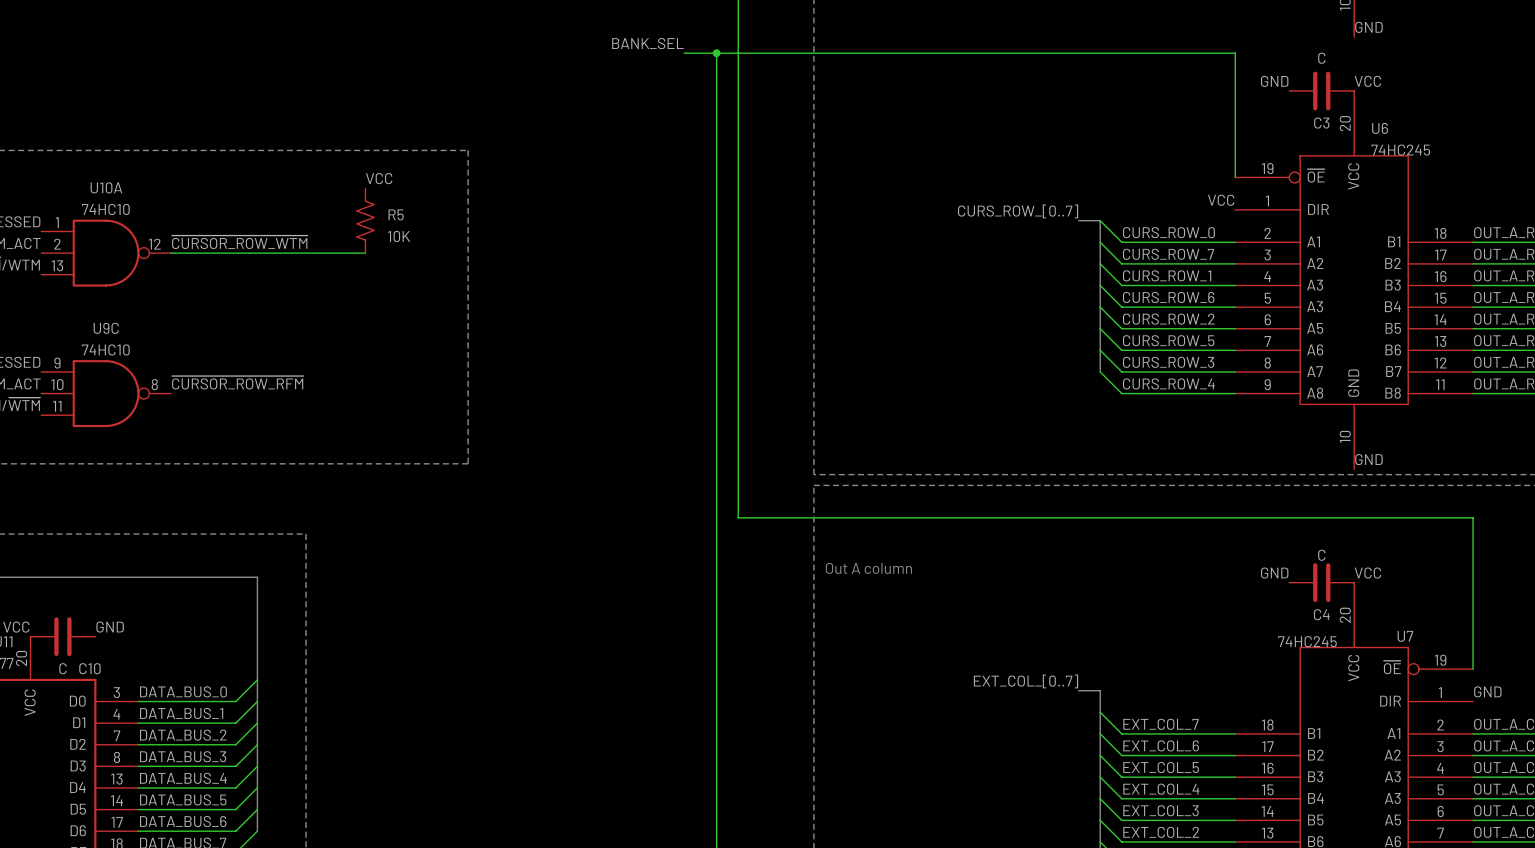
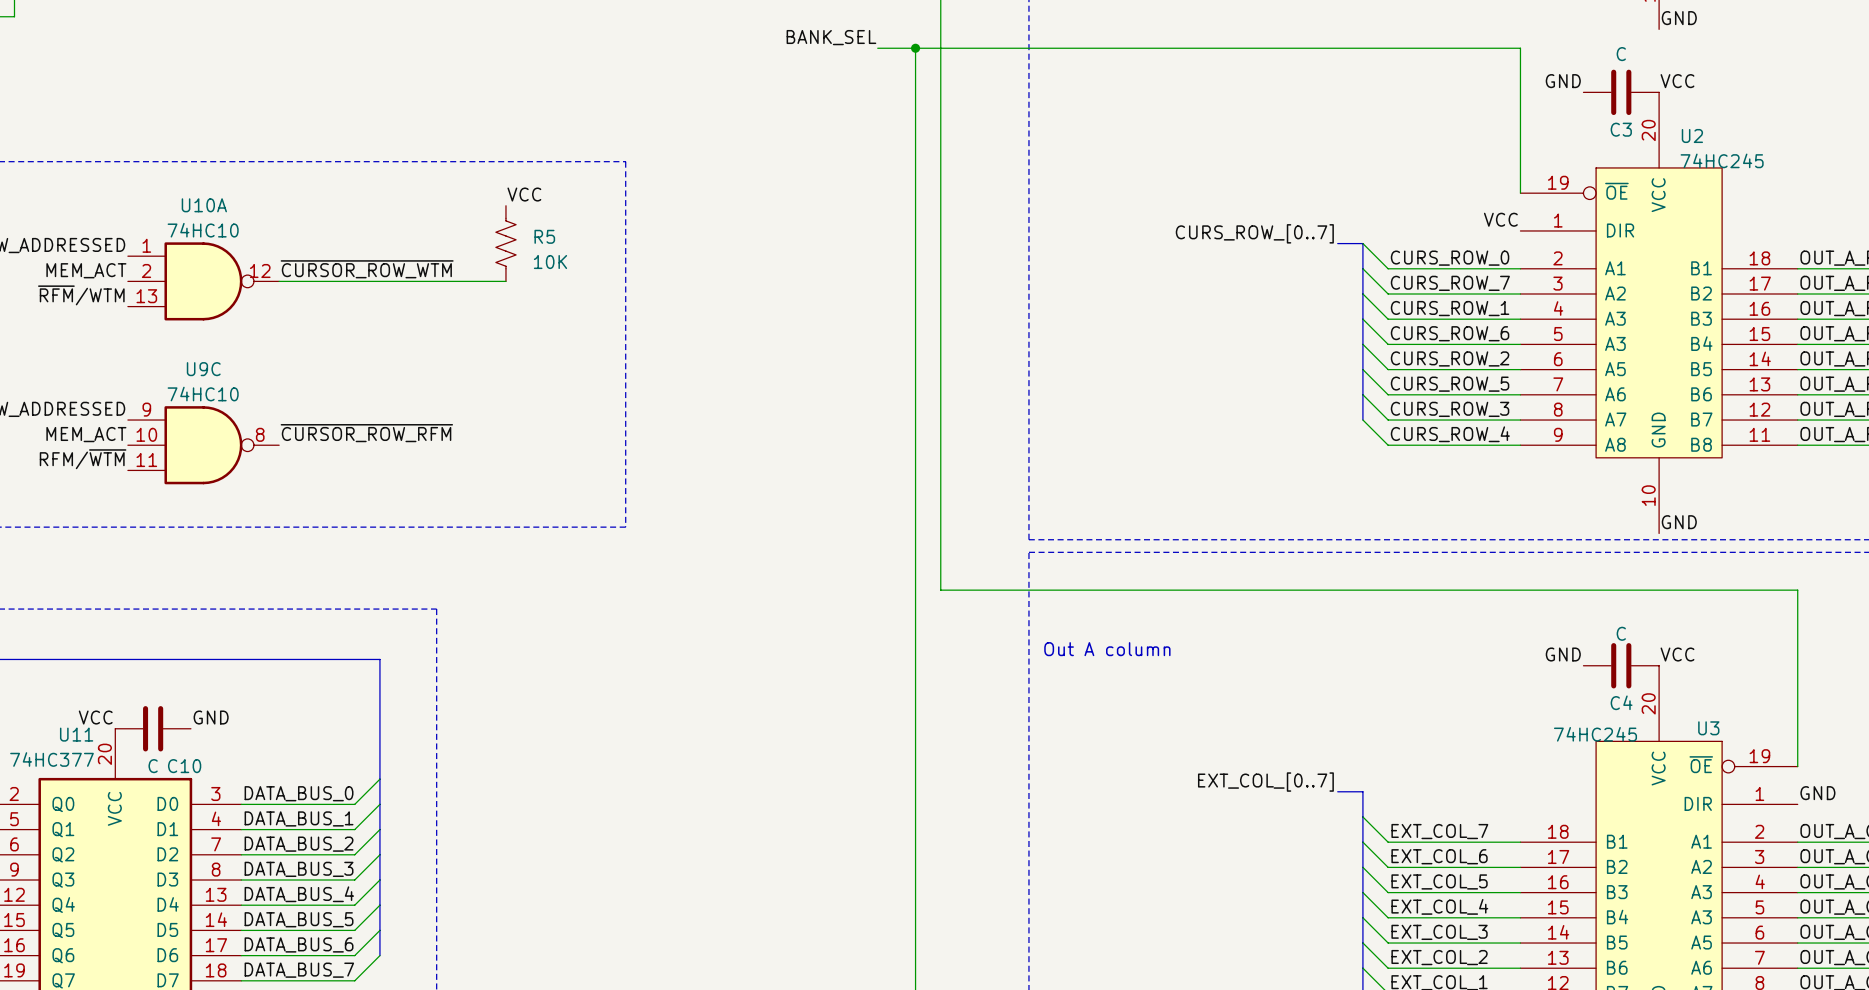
U6 name: U6 (1380, 128) -> U2 (1692, 135)
U7 name: U7 (1405, 636) -> U3 (1708, 728)

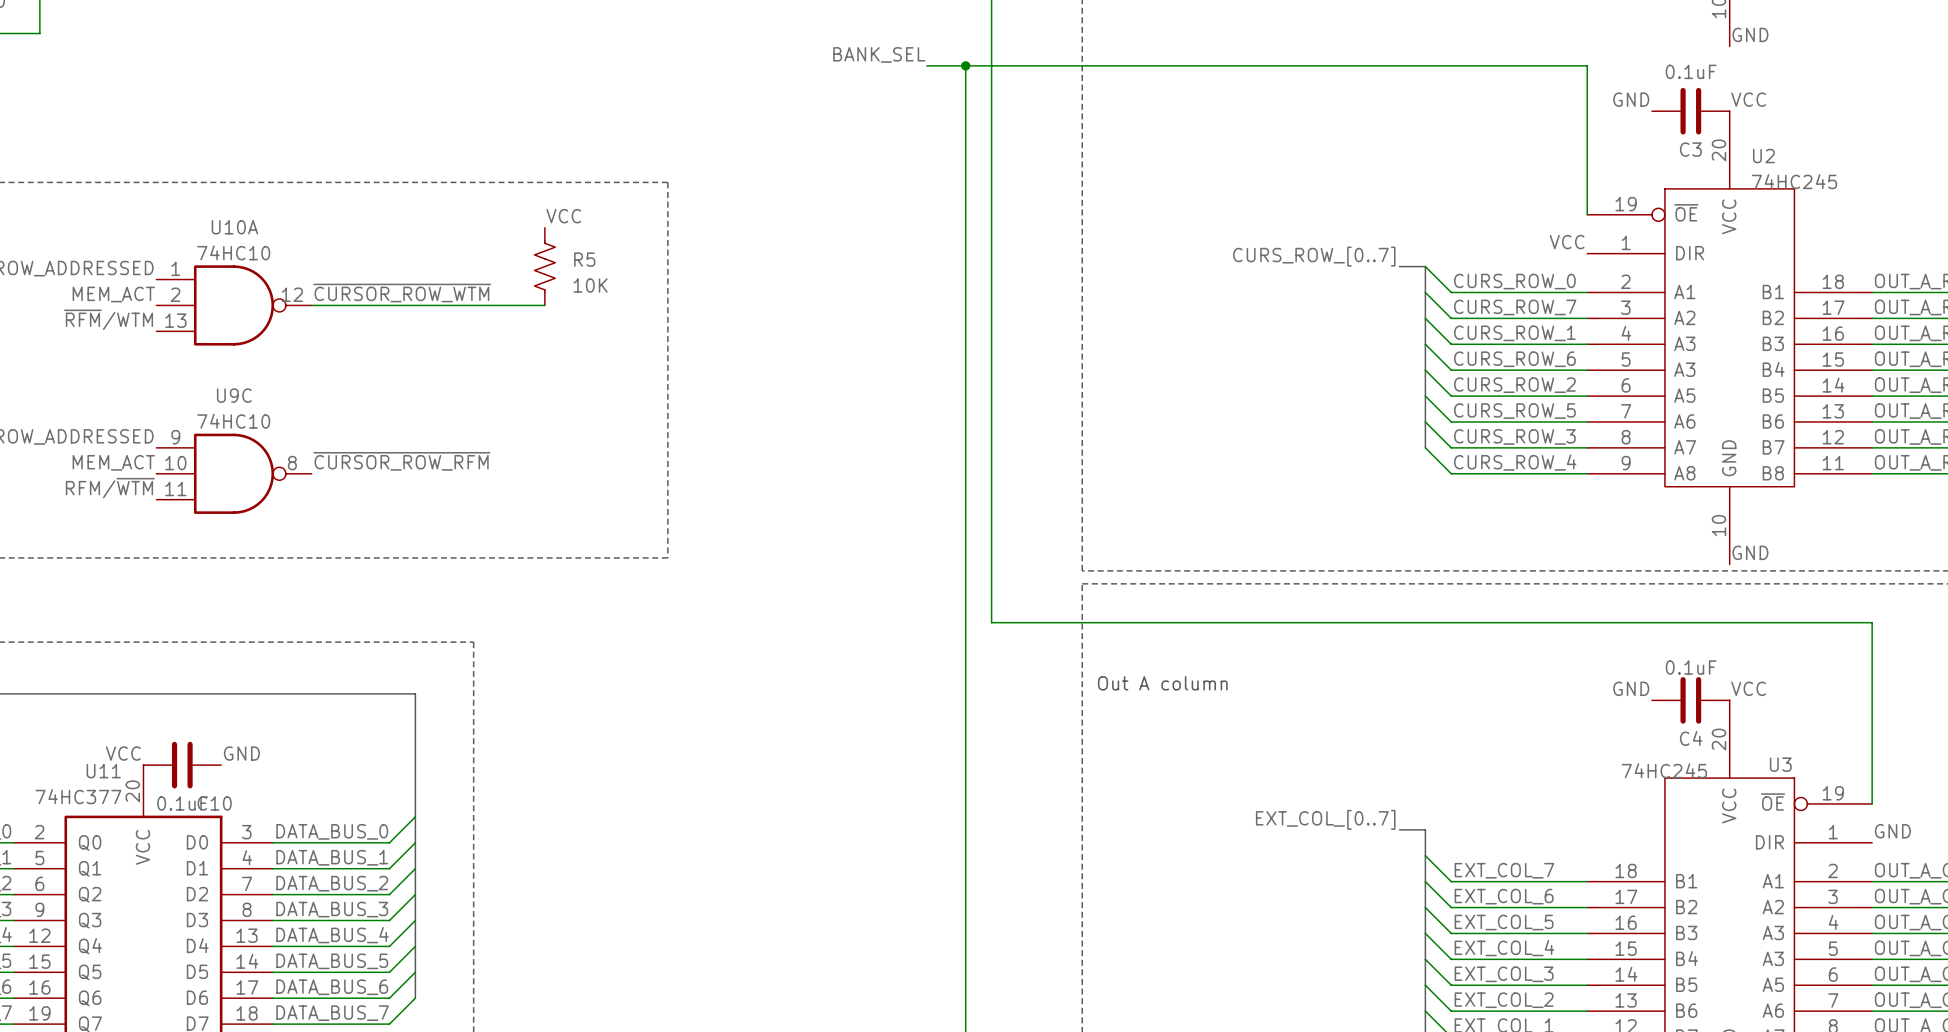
C3 value: C (1621, 54) -> 0.1uF (1691, 71)
C4 value: C (1621, 633) -> 0.1uF (1691, 667)
C10 value: C (153, 766) -> 0.1uF (182, 803)

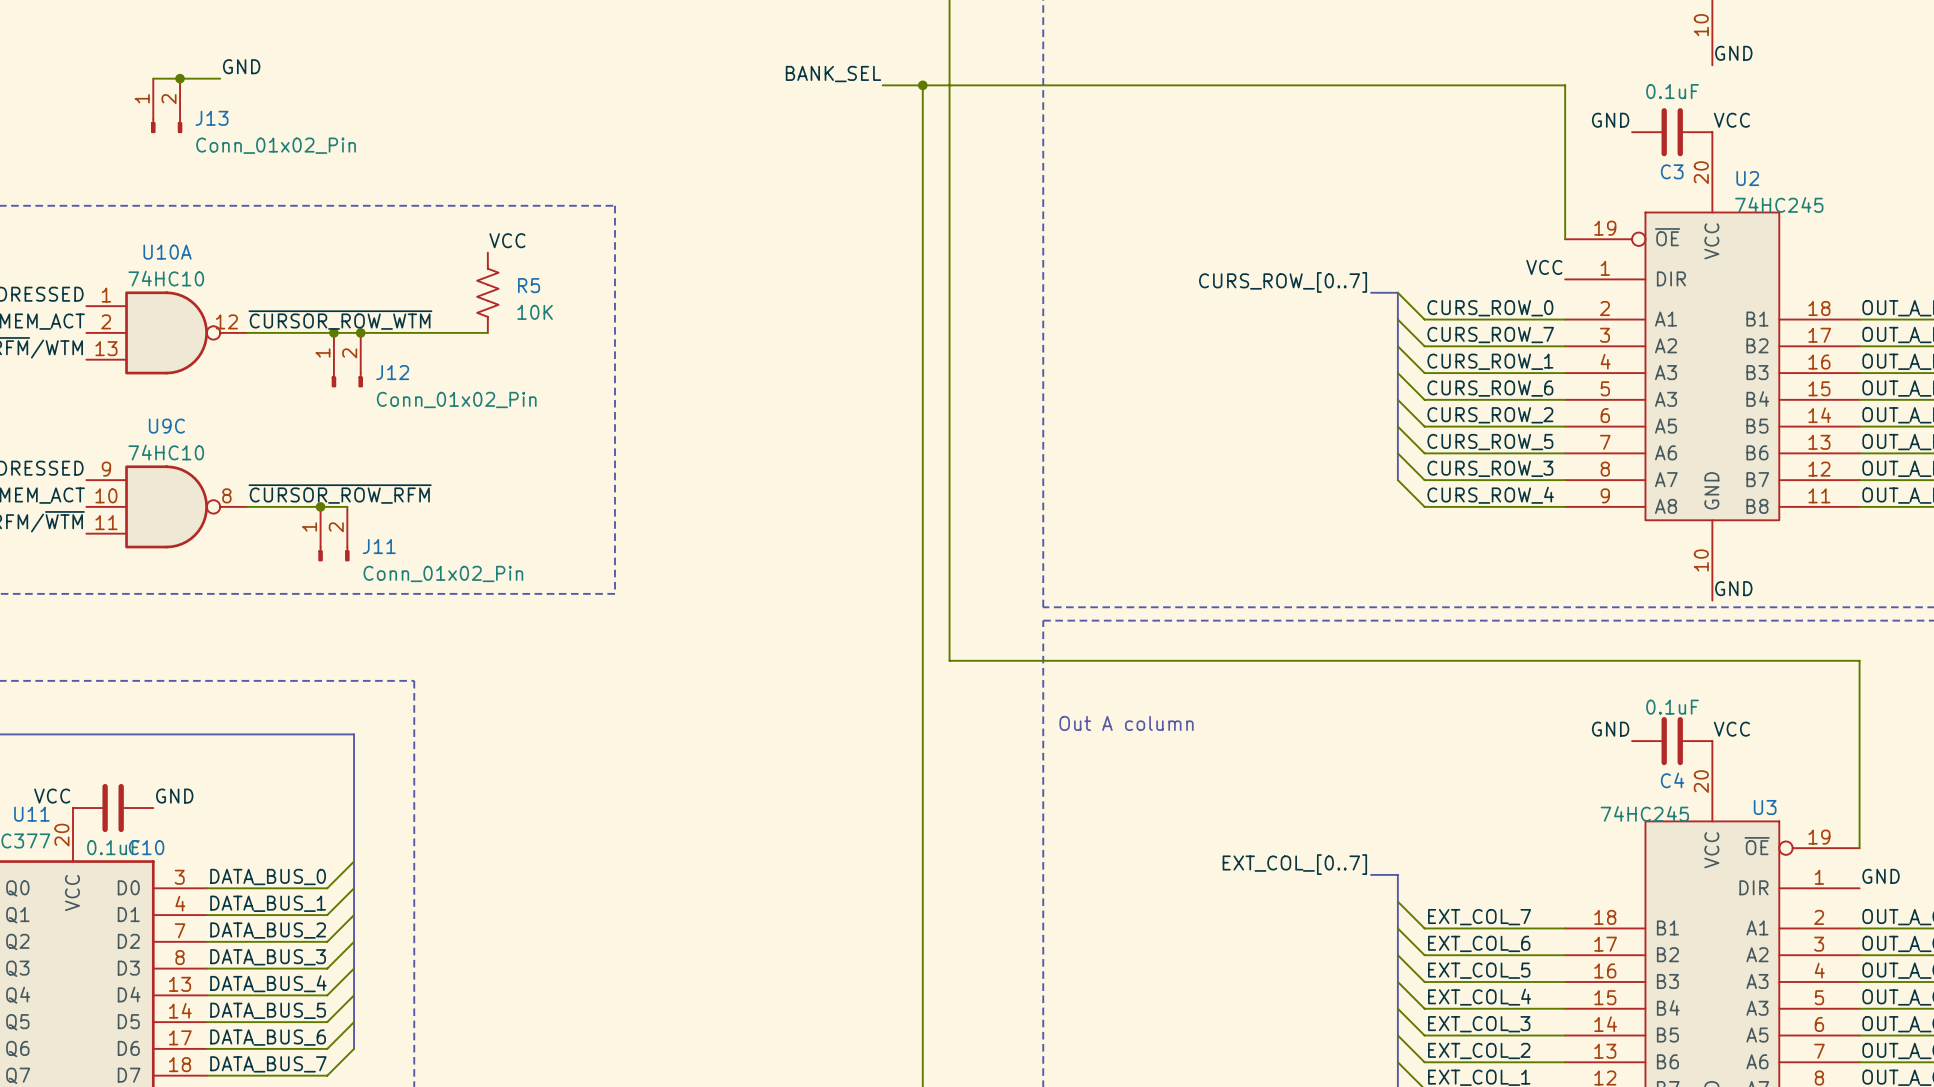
label: none -> GND (241, 66)
wire: none -> (153, 78) (220, 78)
junction: none -> (180, 78)
J13: none -> Conn_01x02_Pin (166, 105)
junction: none -> (333, 332)
junction: none -> (360, 332)
J12: none -> Conn_01x02_Pin (347, 360)
wire: none -> (246, 506) (347, 506)
junction: none -> (320, 506)
J11: none -> Conn_01x02_Pin (333, 534)

